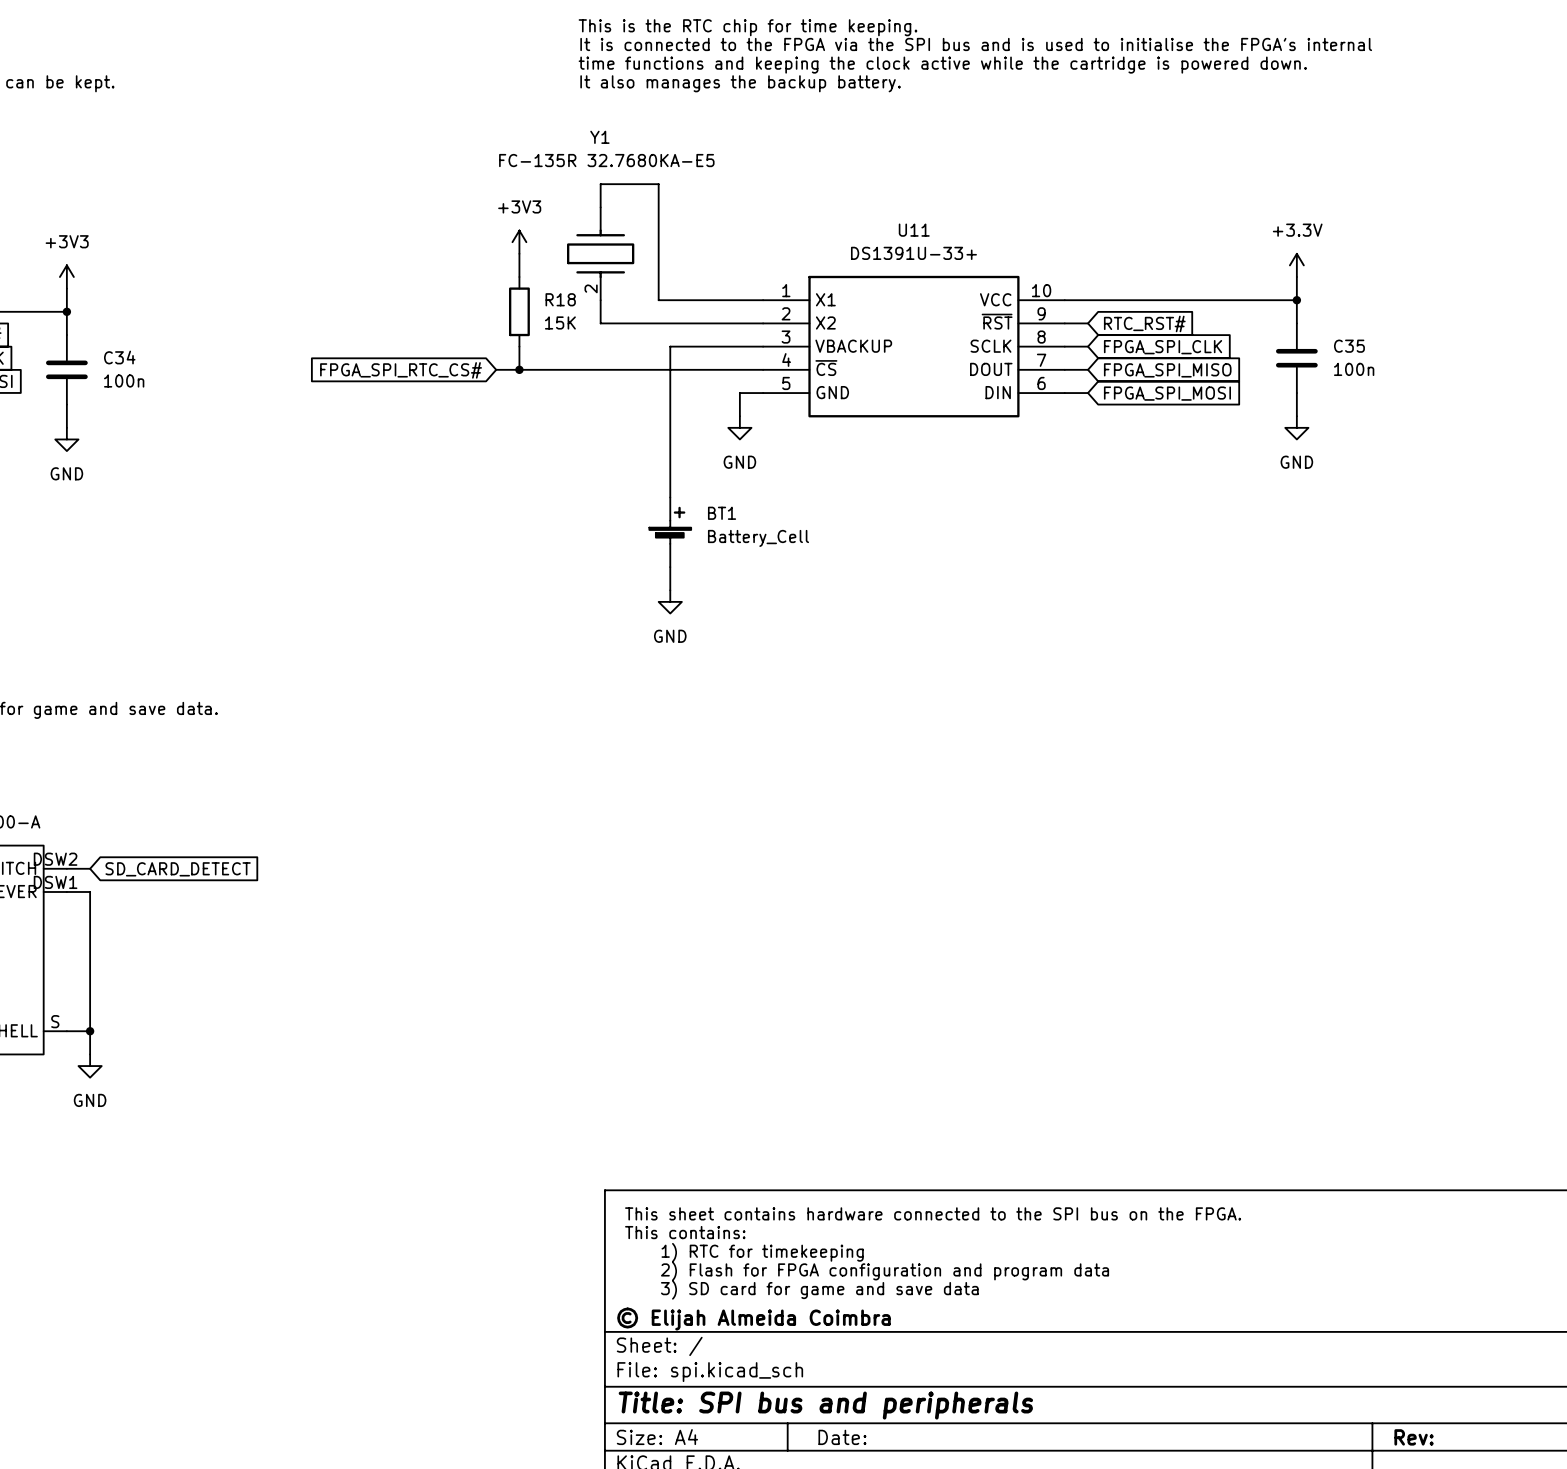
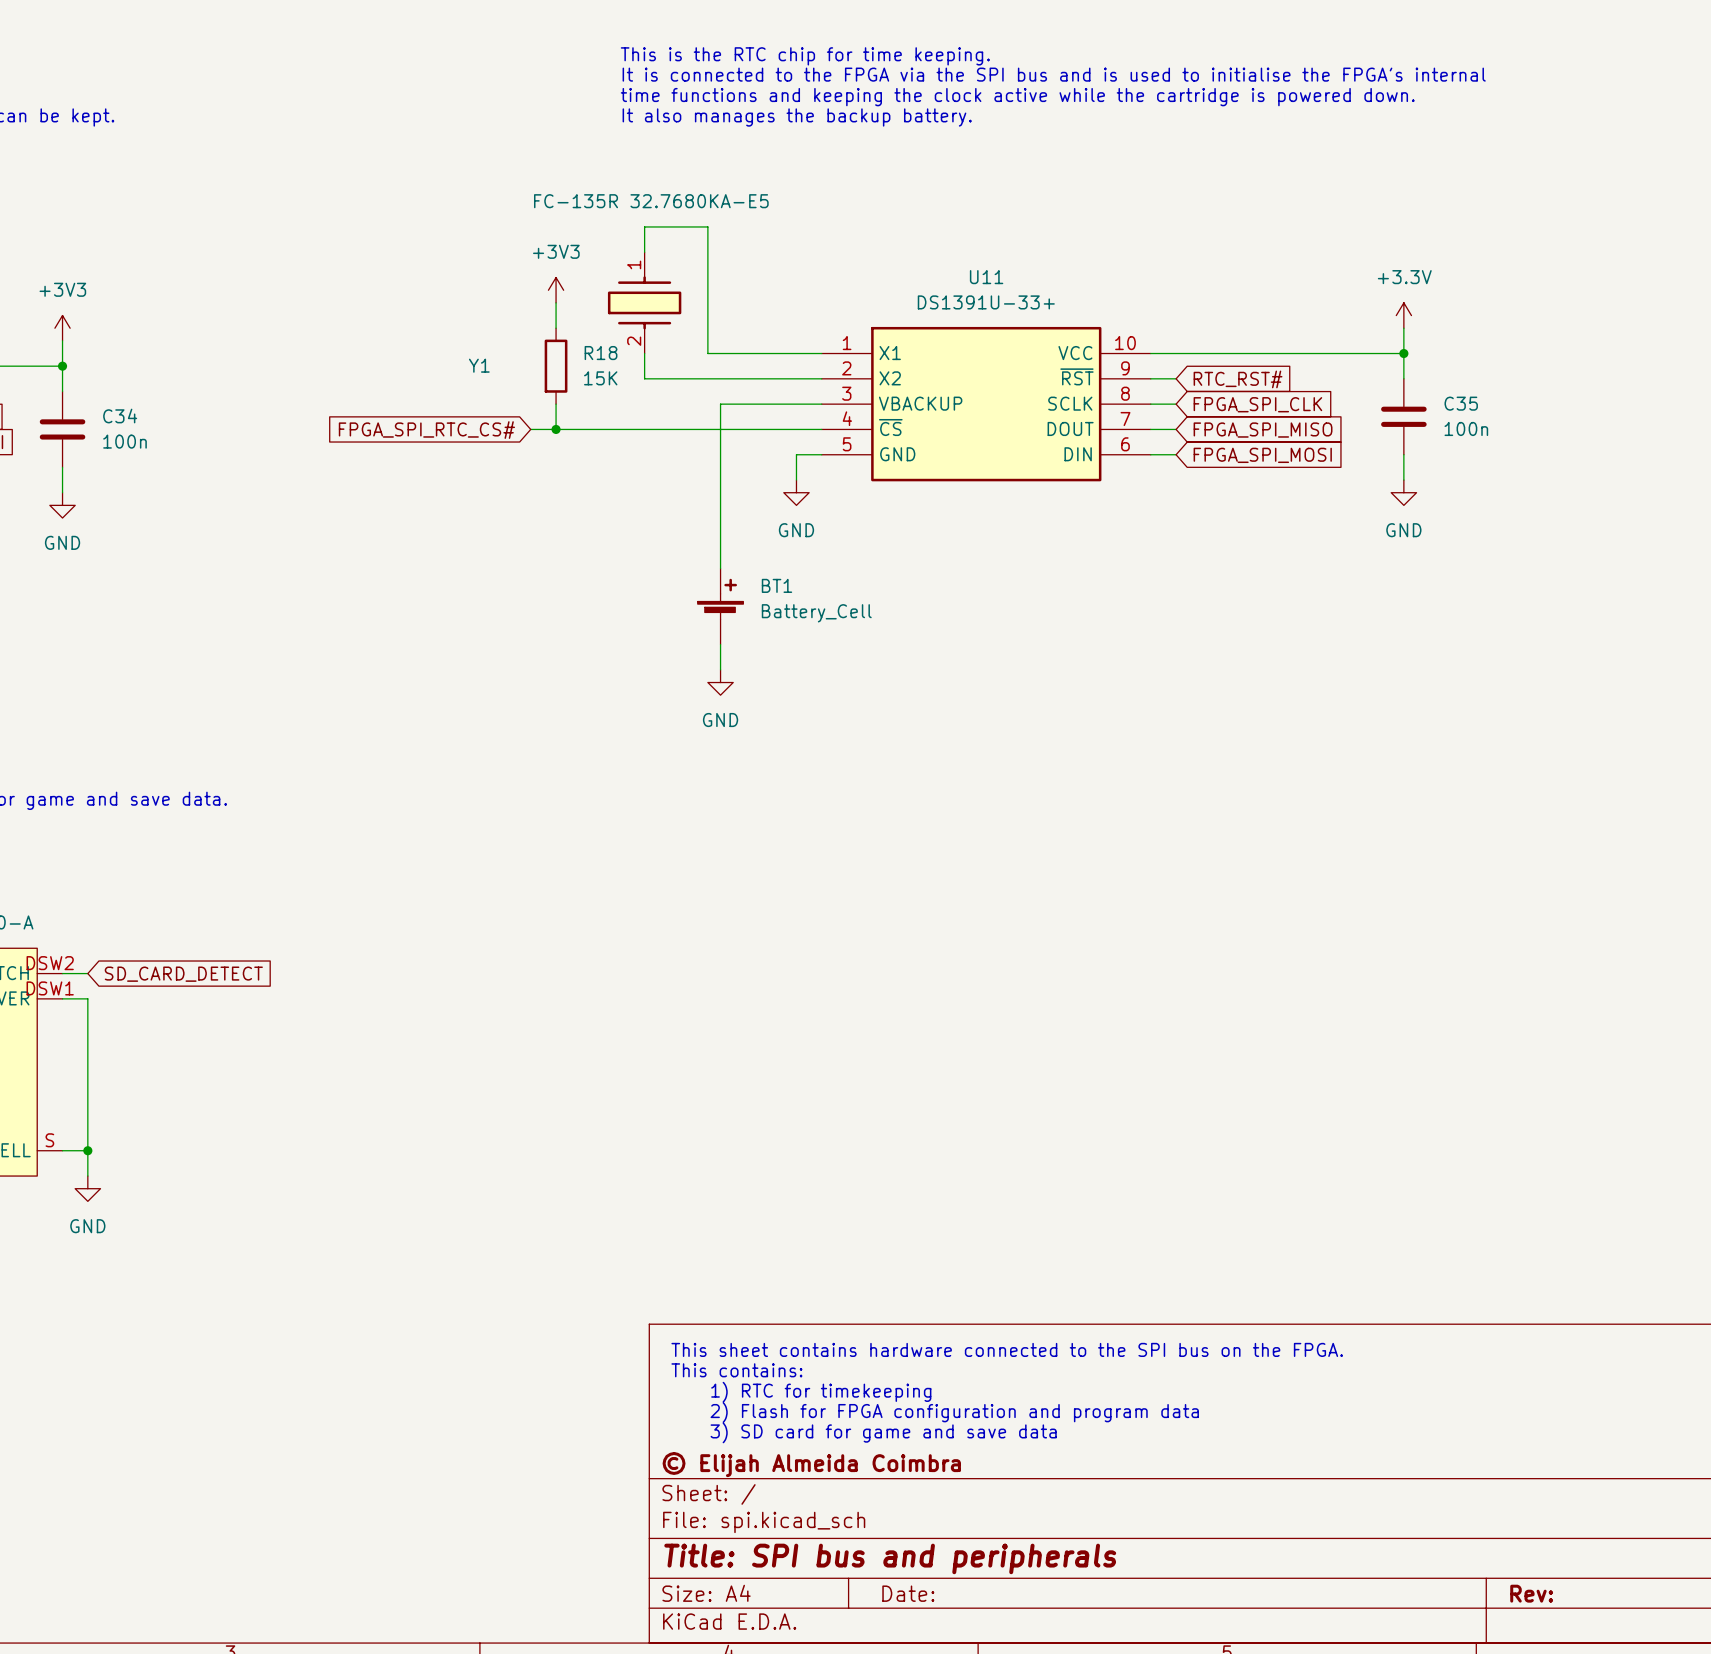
Y1 name position: Y1 (599, 137) -> Y1 (479, 365)
Y1 pin number: none -> 1 (634, 264)

